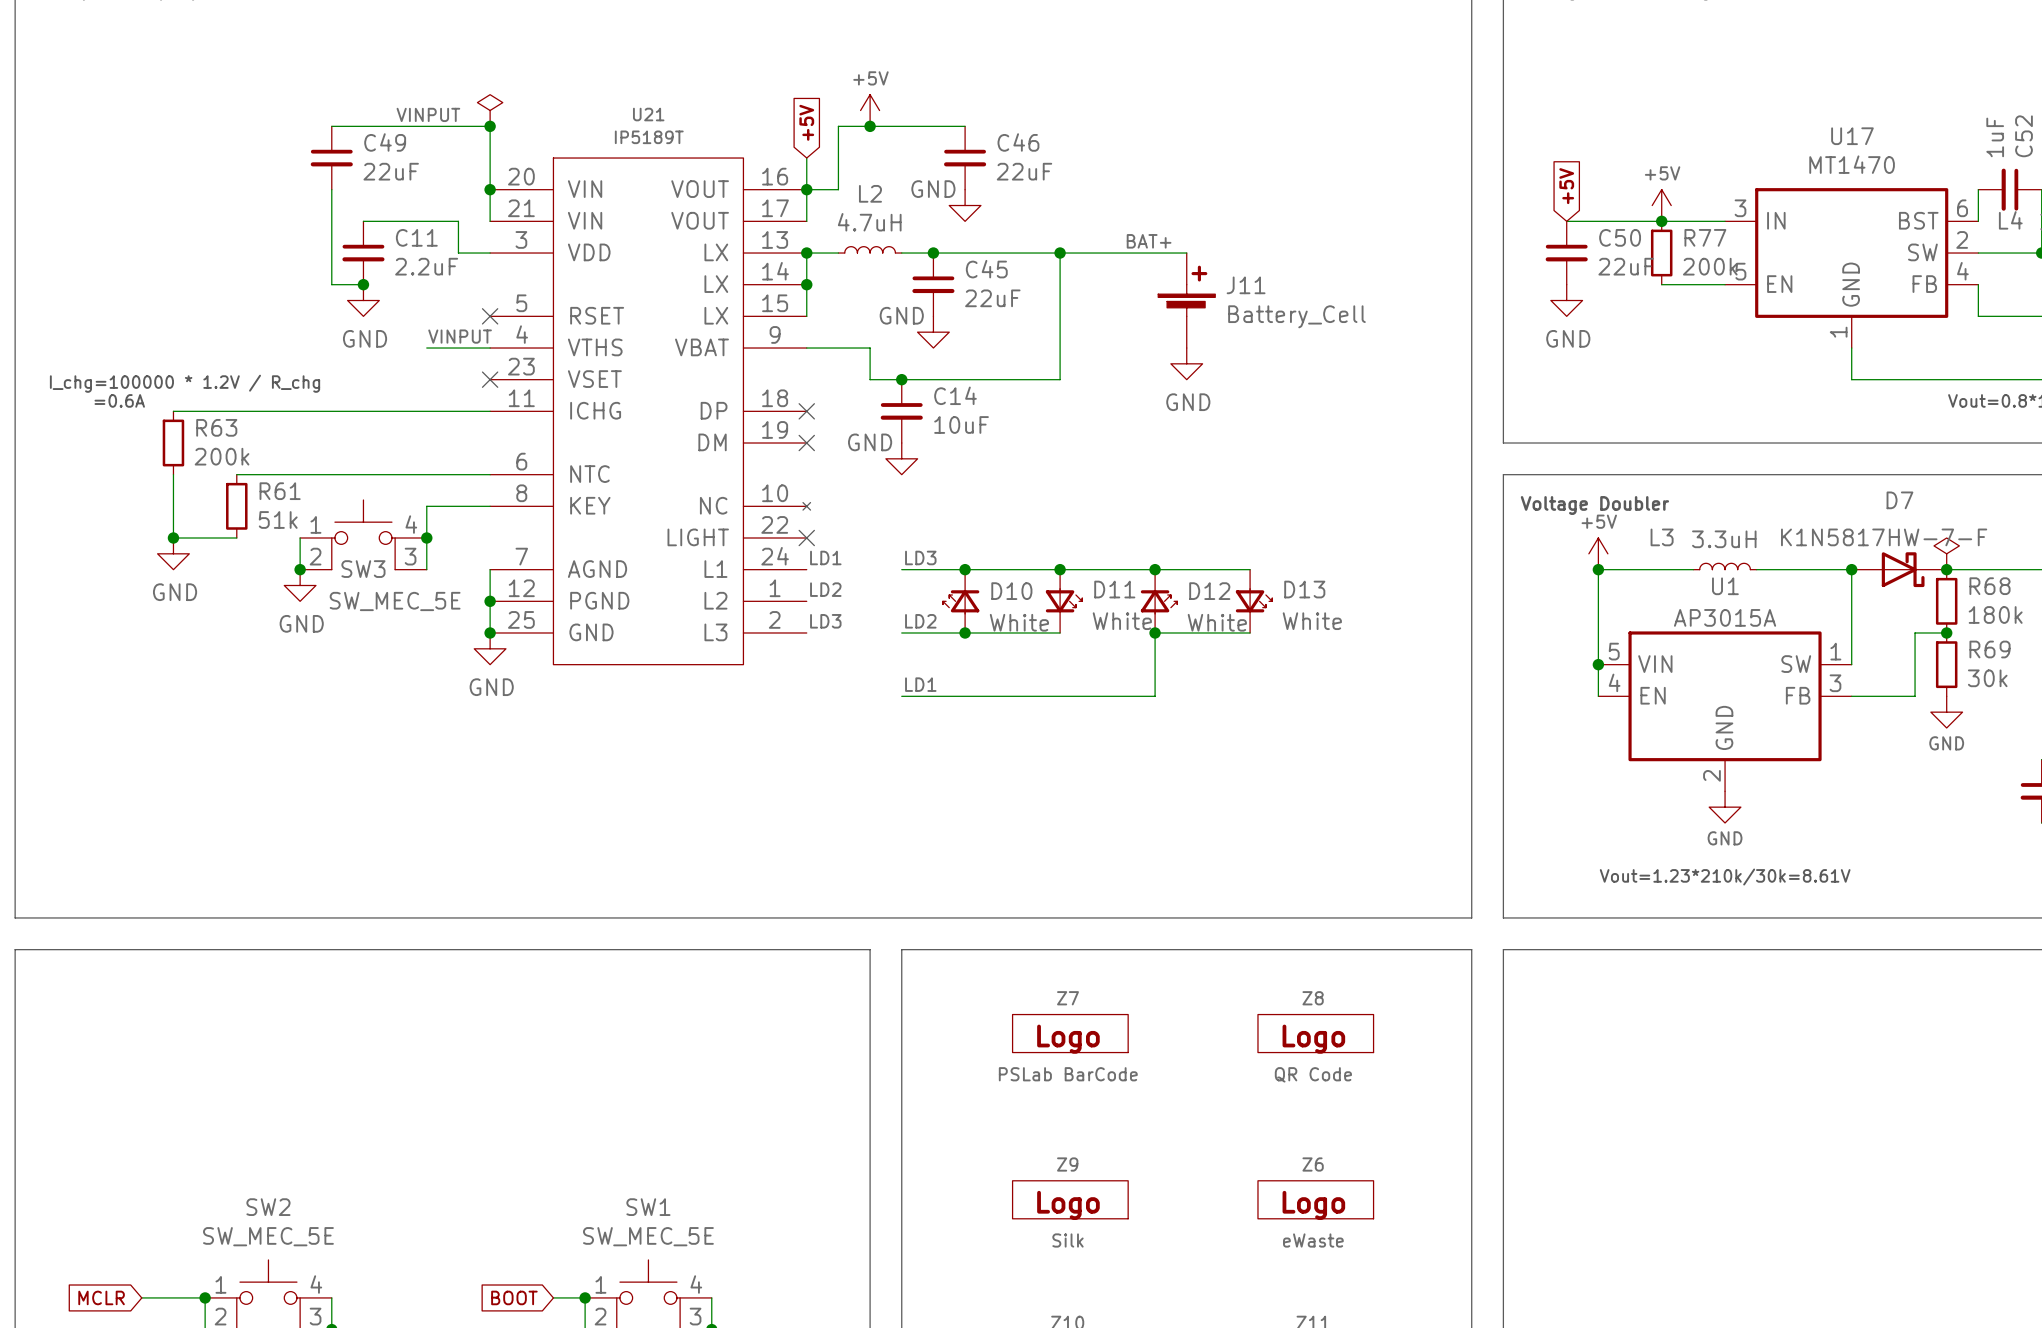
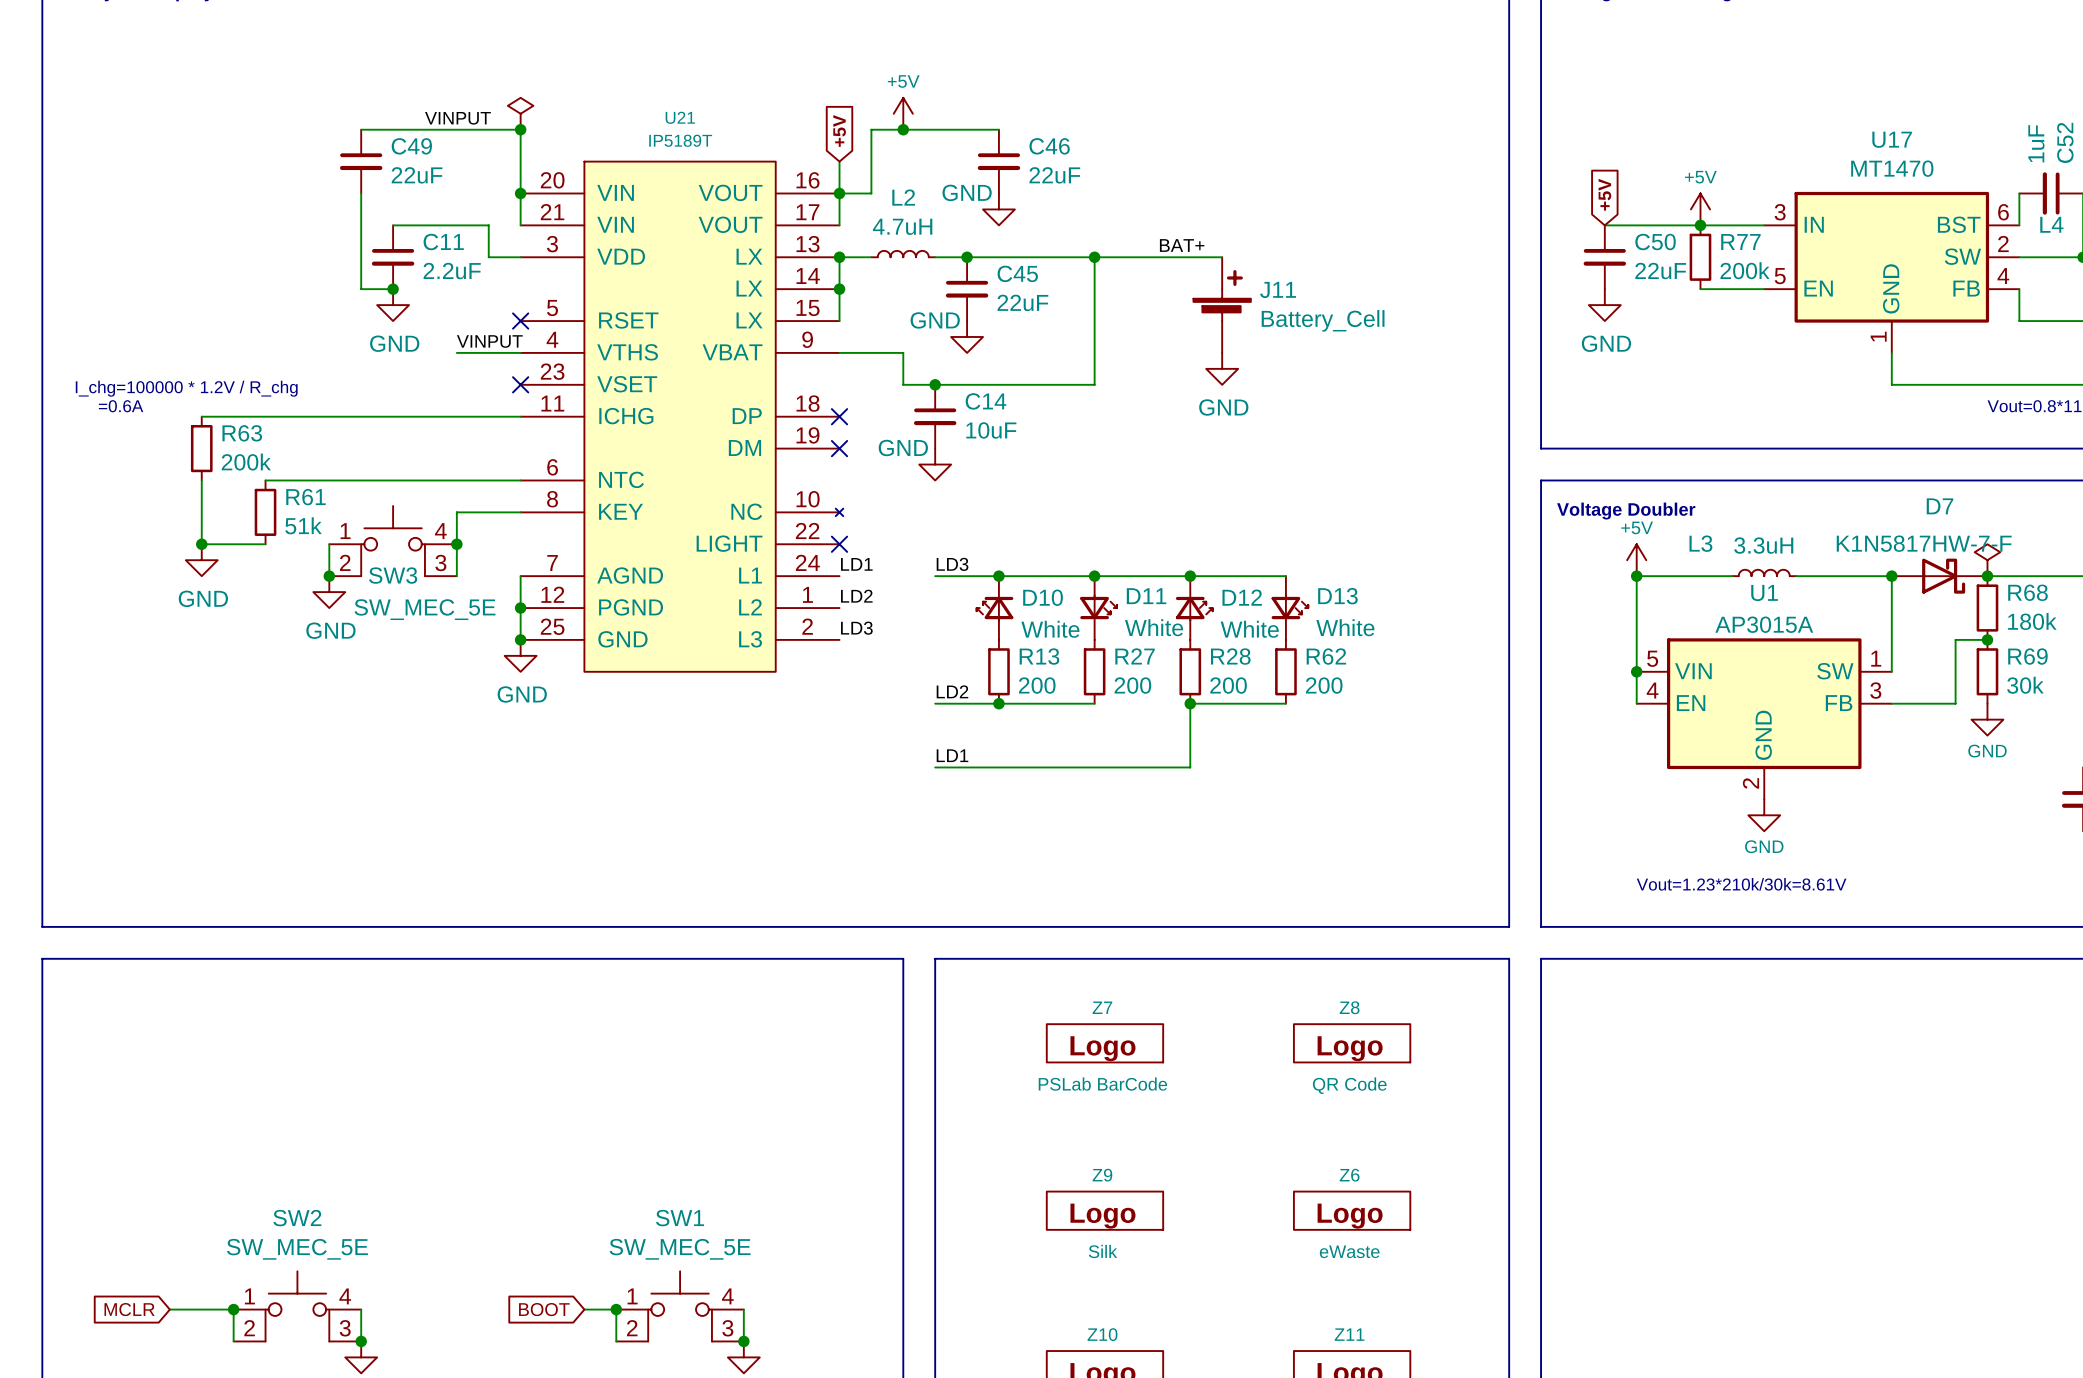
label: LD2 (920, 621) -> none
wire: (901, 632) (1060, 632) -> none
junction position: (965, 632) -> (998, 703)
junction position: (1155, 632) -> (1190, 703)
wire: (1250, 632) (1155, 632) (1155, 696) (1060, 696) -> none
R13: none -> 200 (998, 671)
R27: none -> 200 (1094, 671)
R28: none -> 200 (1190, 671)
R62: none -> 200 (1285, 671)
label: LD1 (920, 684) -> LD2 (952, 691)
wire: none -> (1285, 703) (1190, 703) (1190, 767) (935, 767)
label: none -> LD1 (952, 755)

